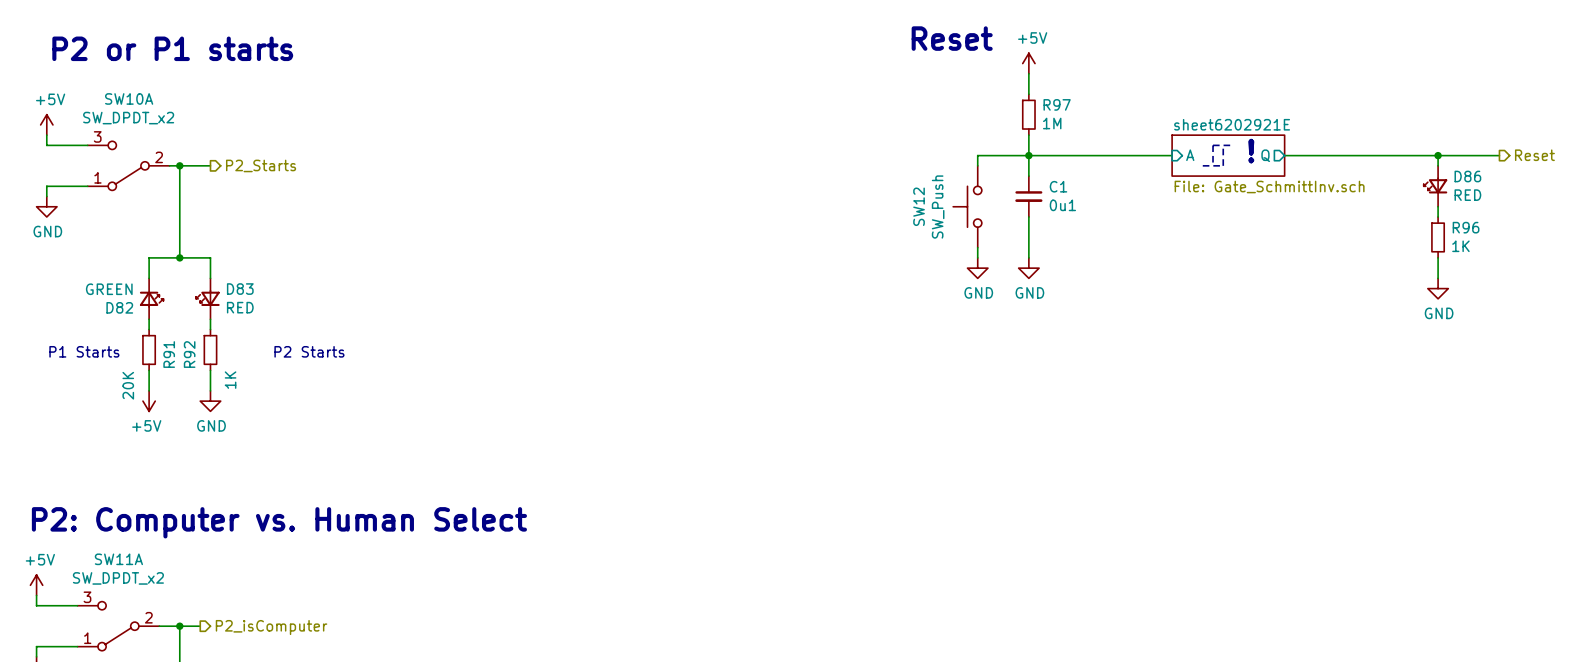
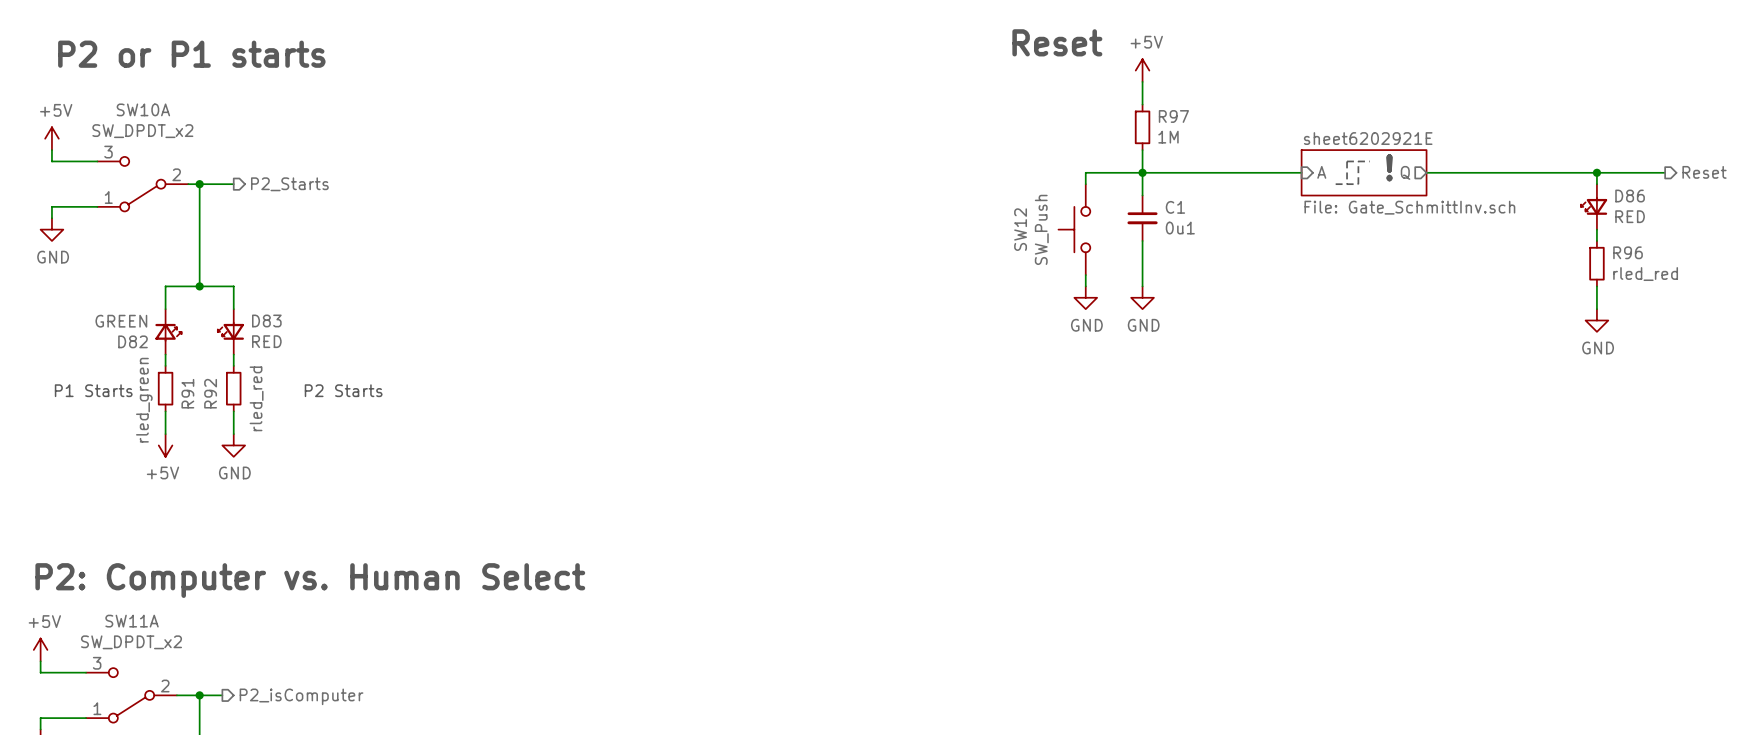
R96 value: 1K (1460, 246) -> rled_red (1645, 274)
R92 value: 1K (230, 380) -> rled_red (256, 398)
R91 value: 20K (128, 385) -> rled_green (144, 400)

